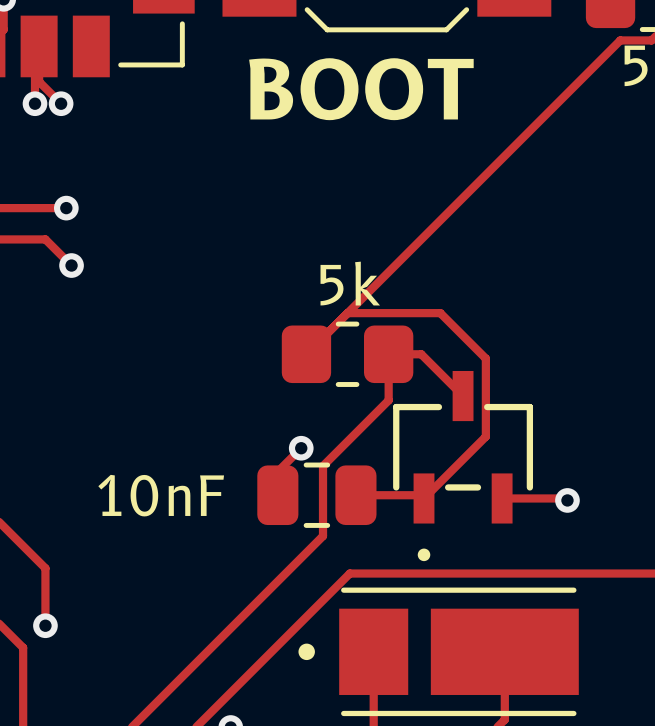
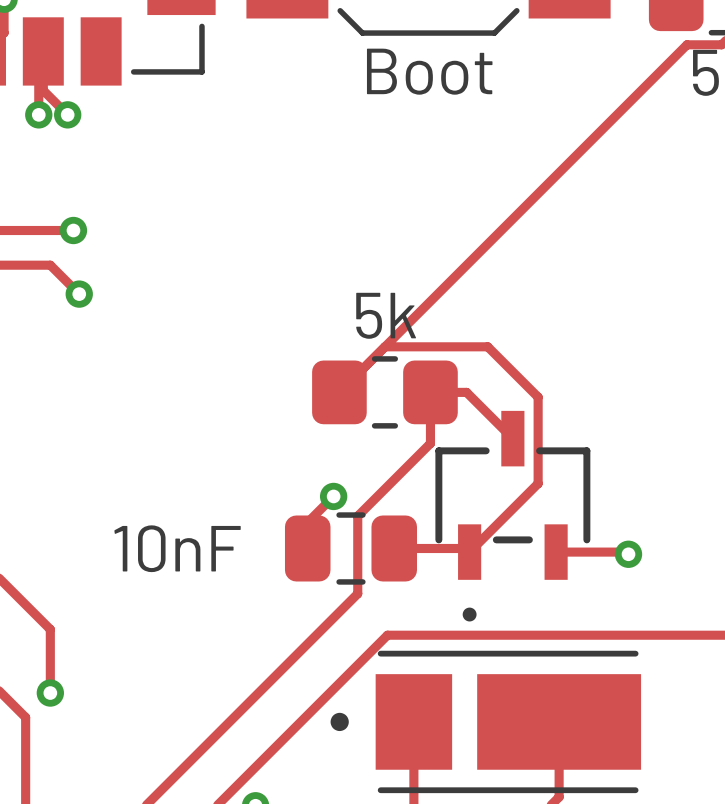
part value: none -> Boot (429, 71)
text: BOOT (361, 89) -> none

